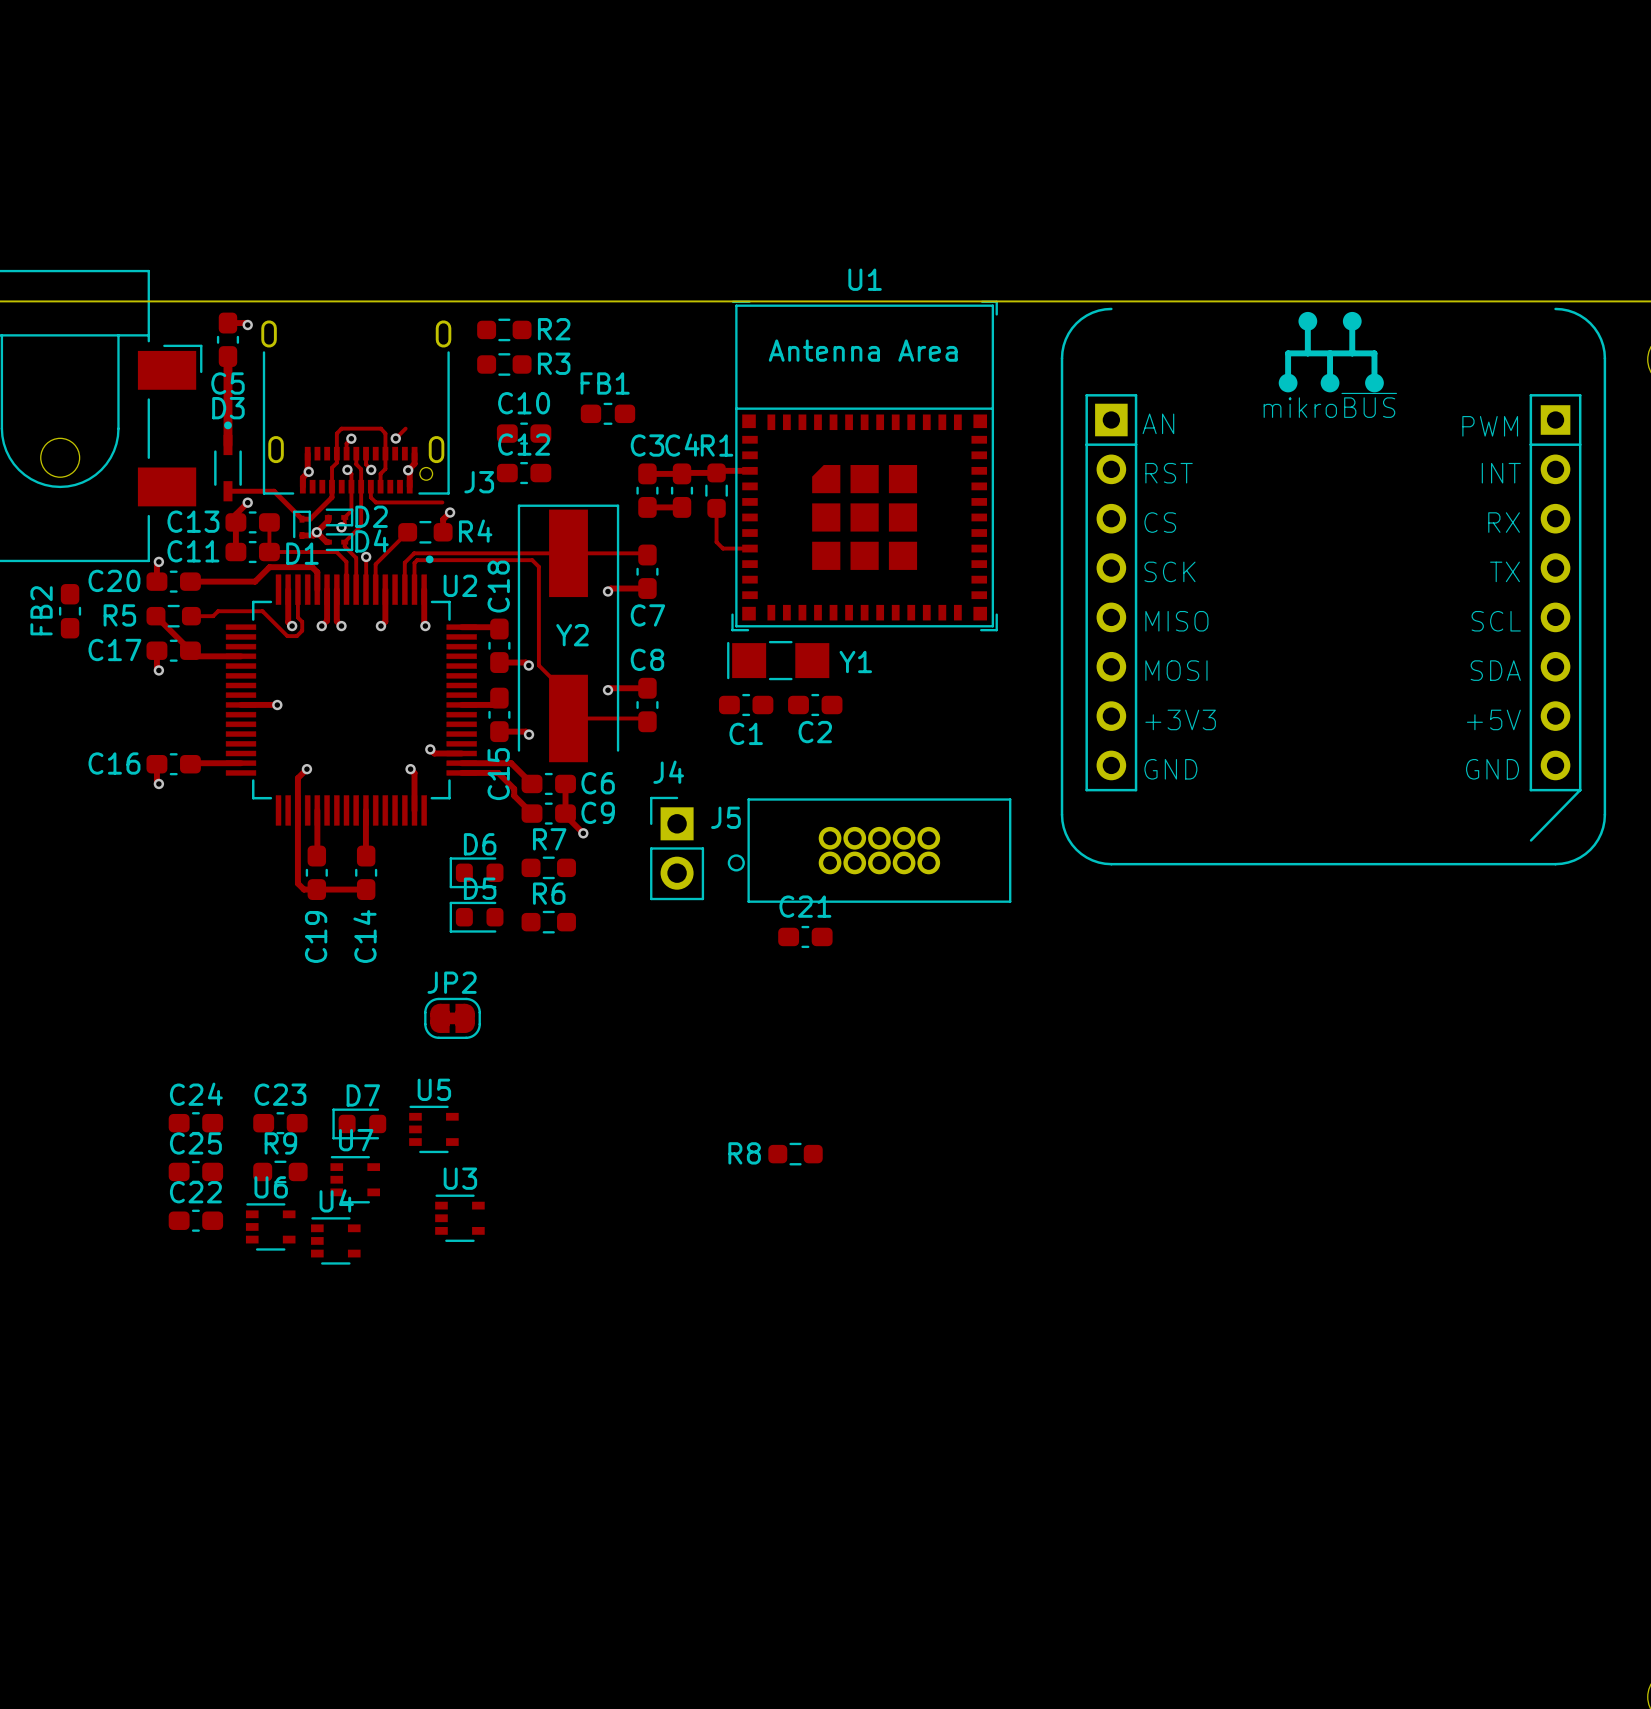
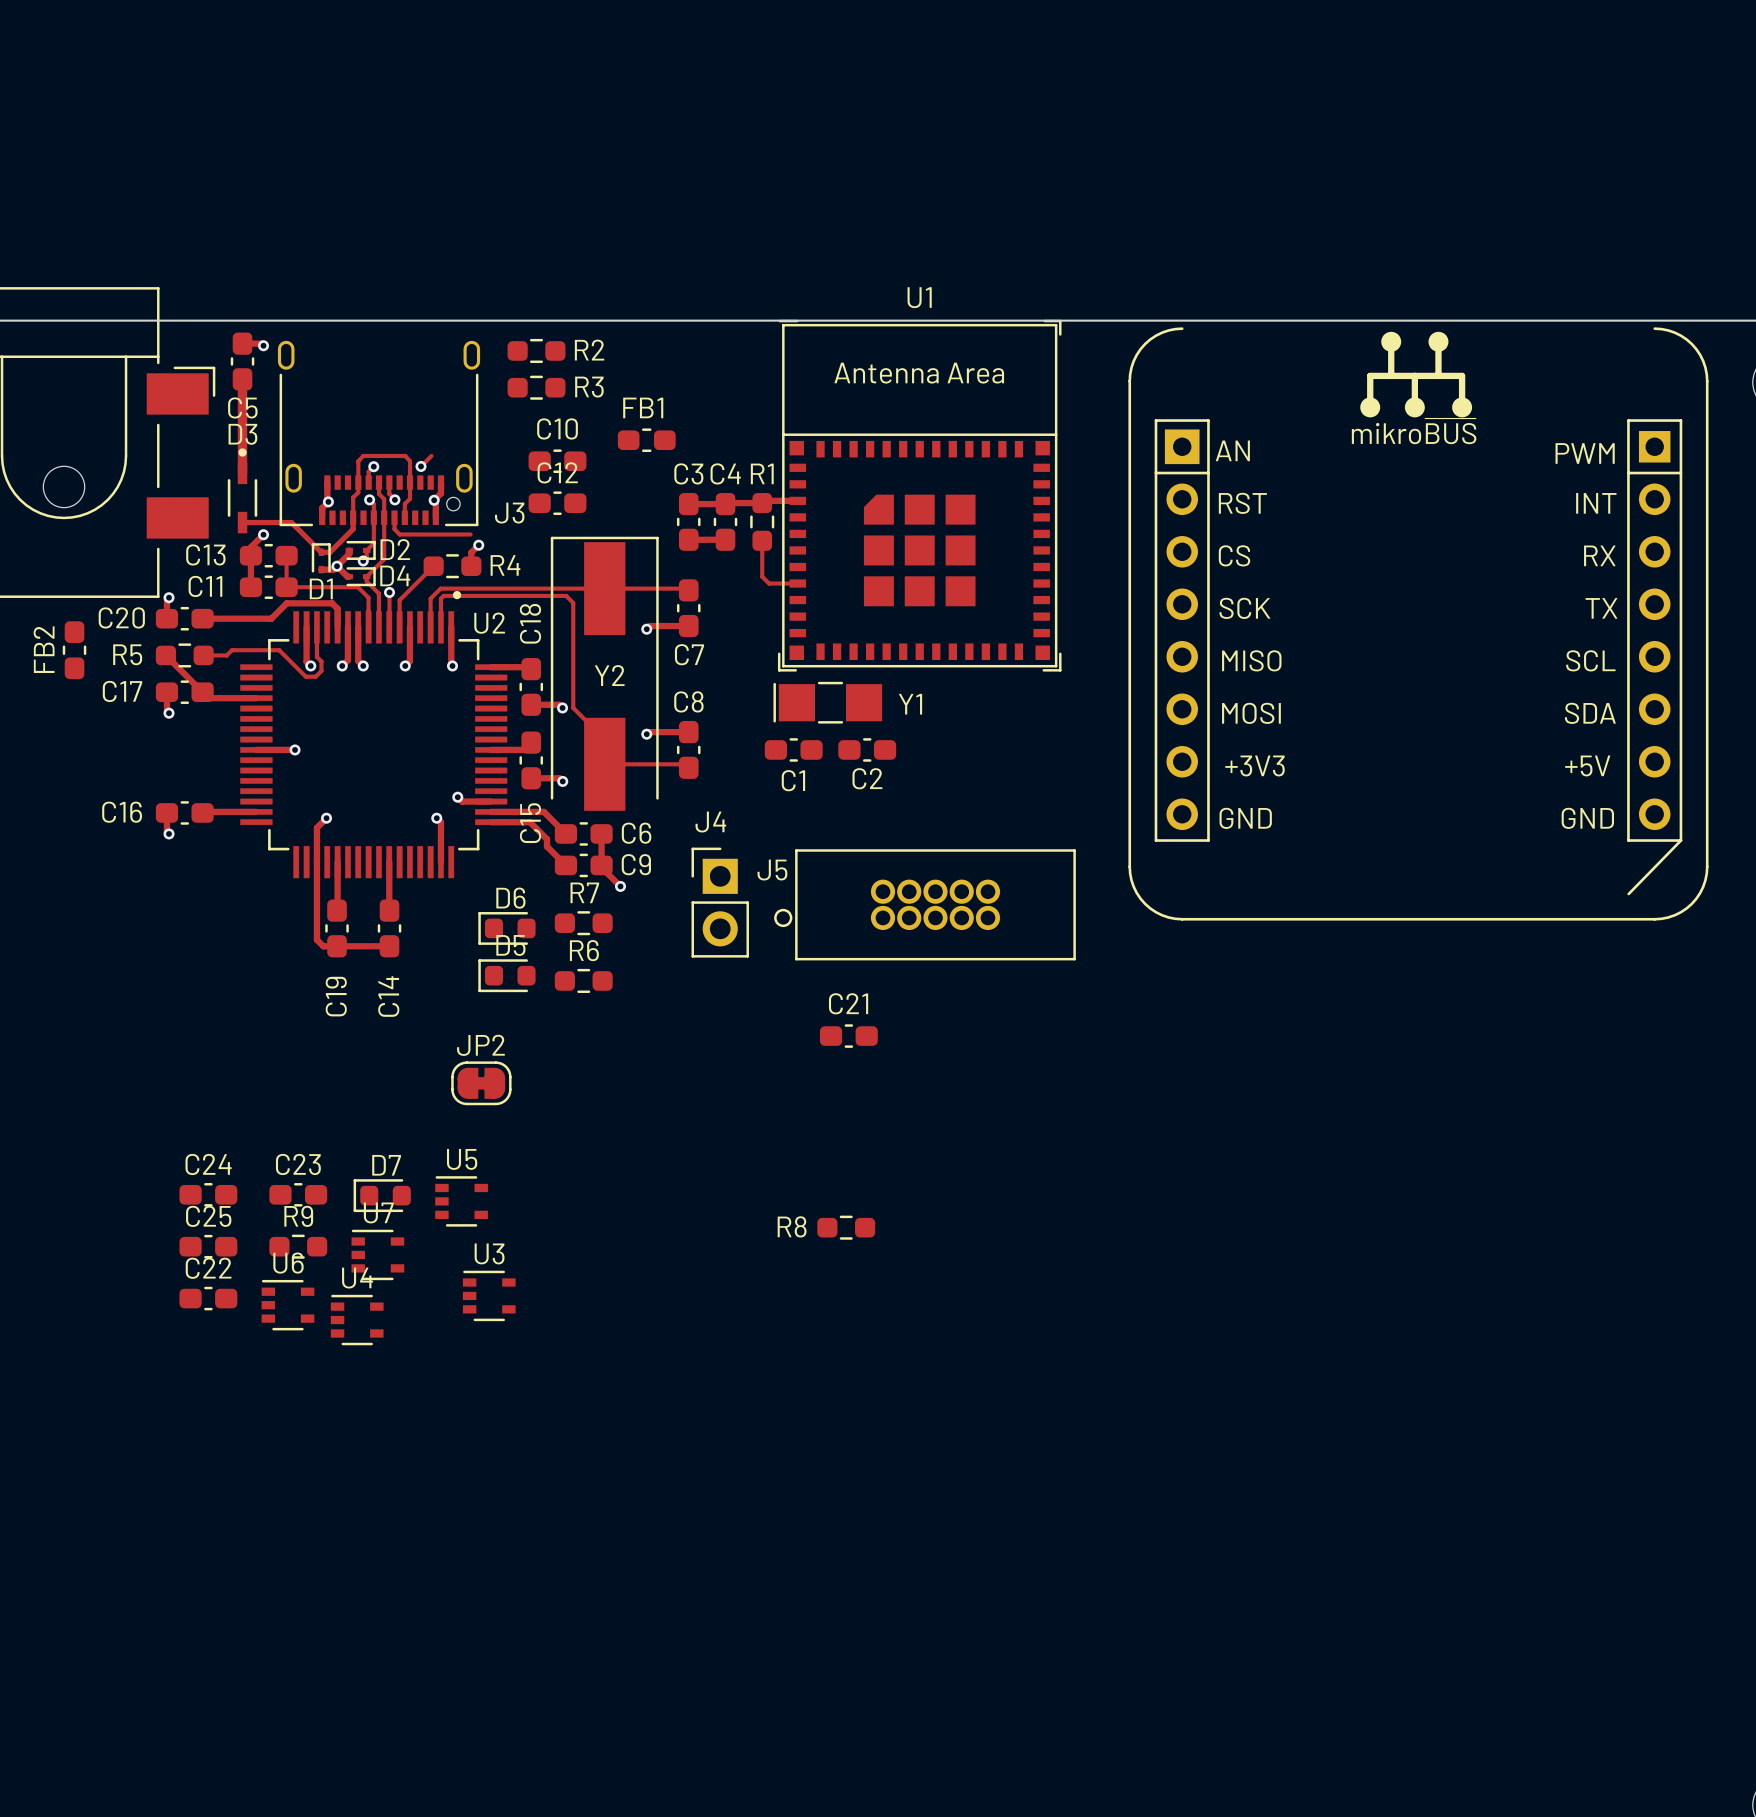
C21 position: (805, 936) -> (848, 1036)

